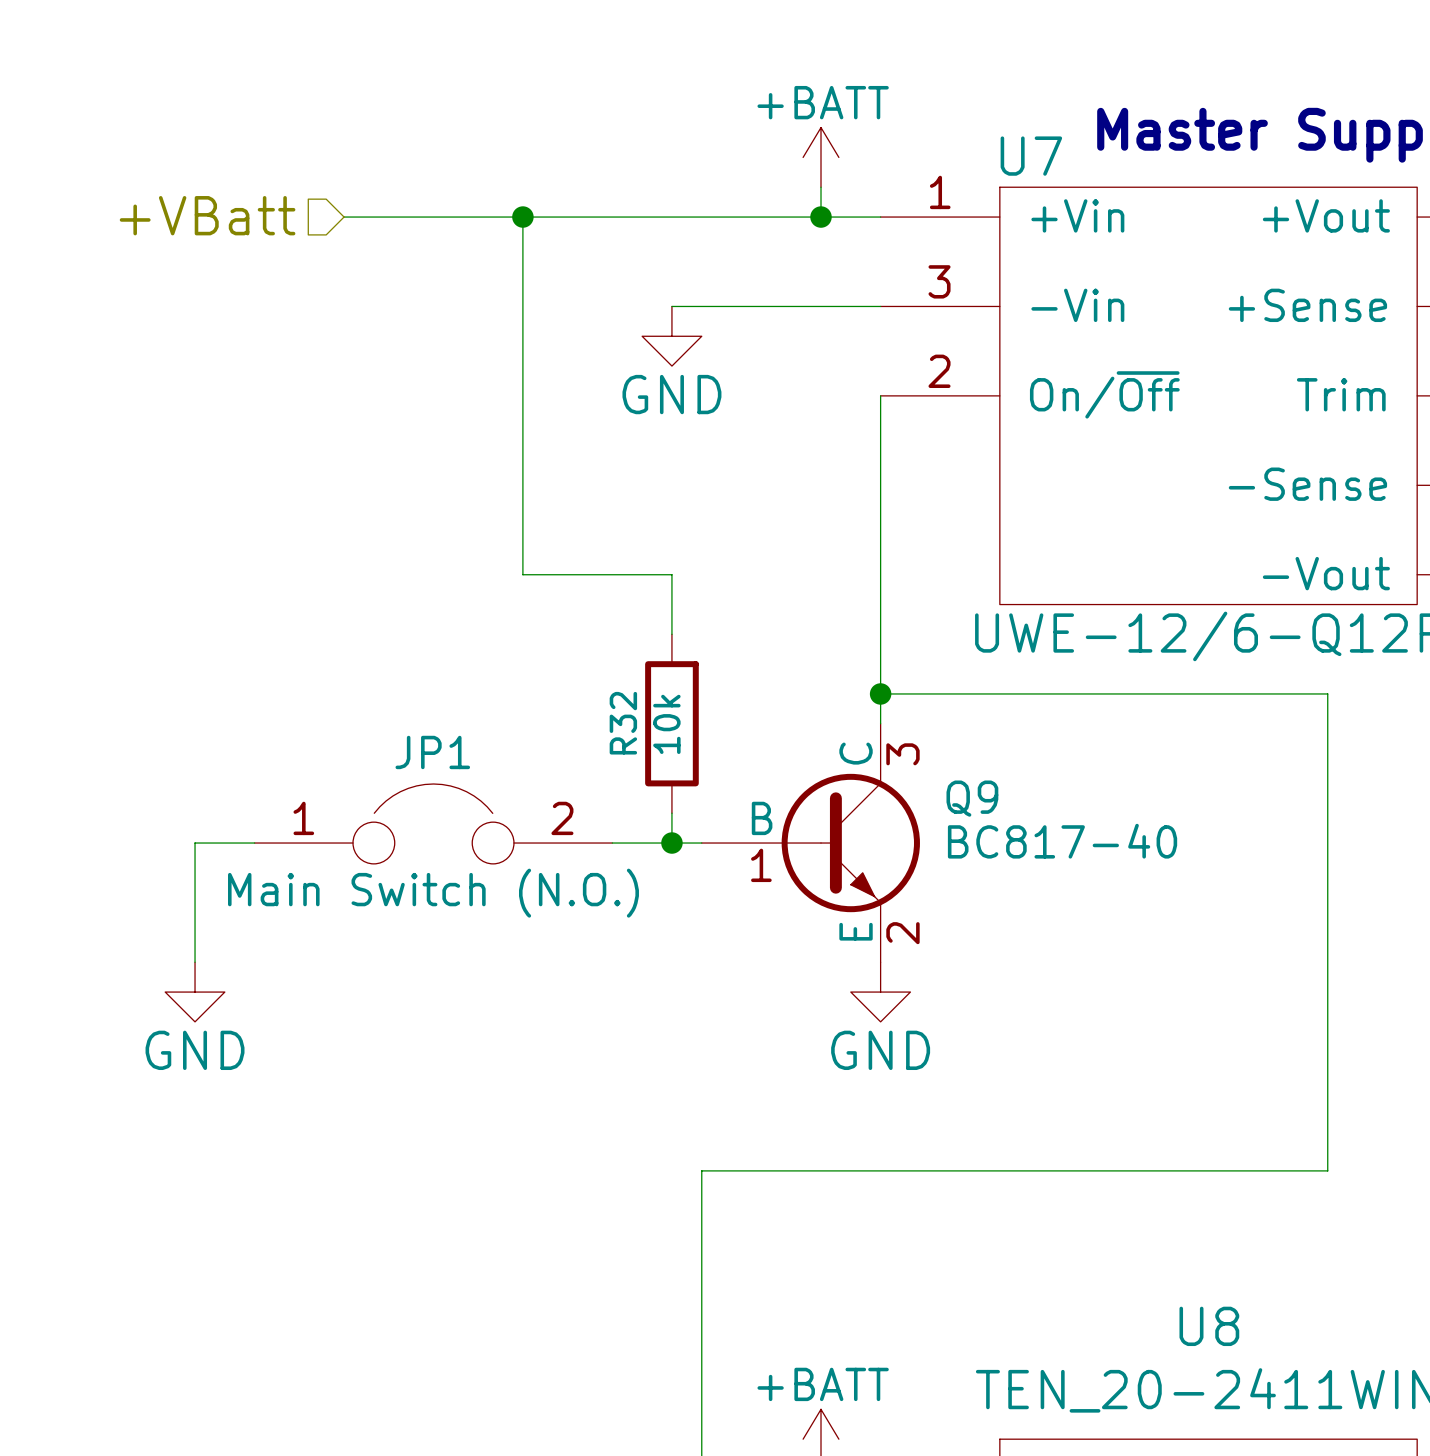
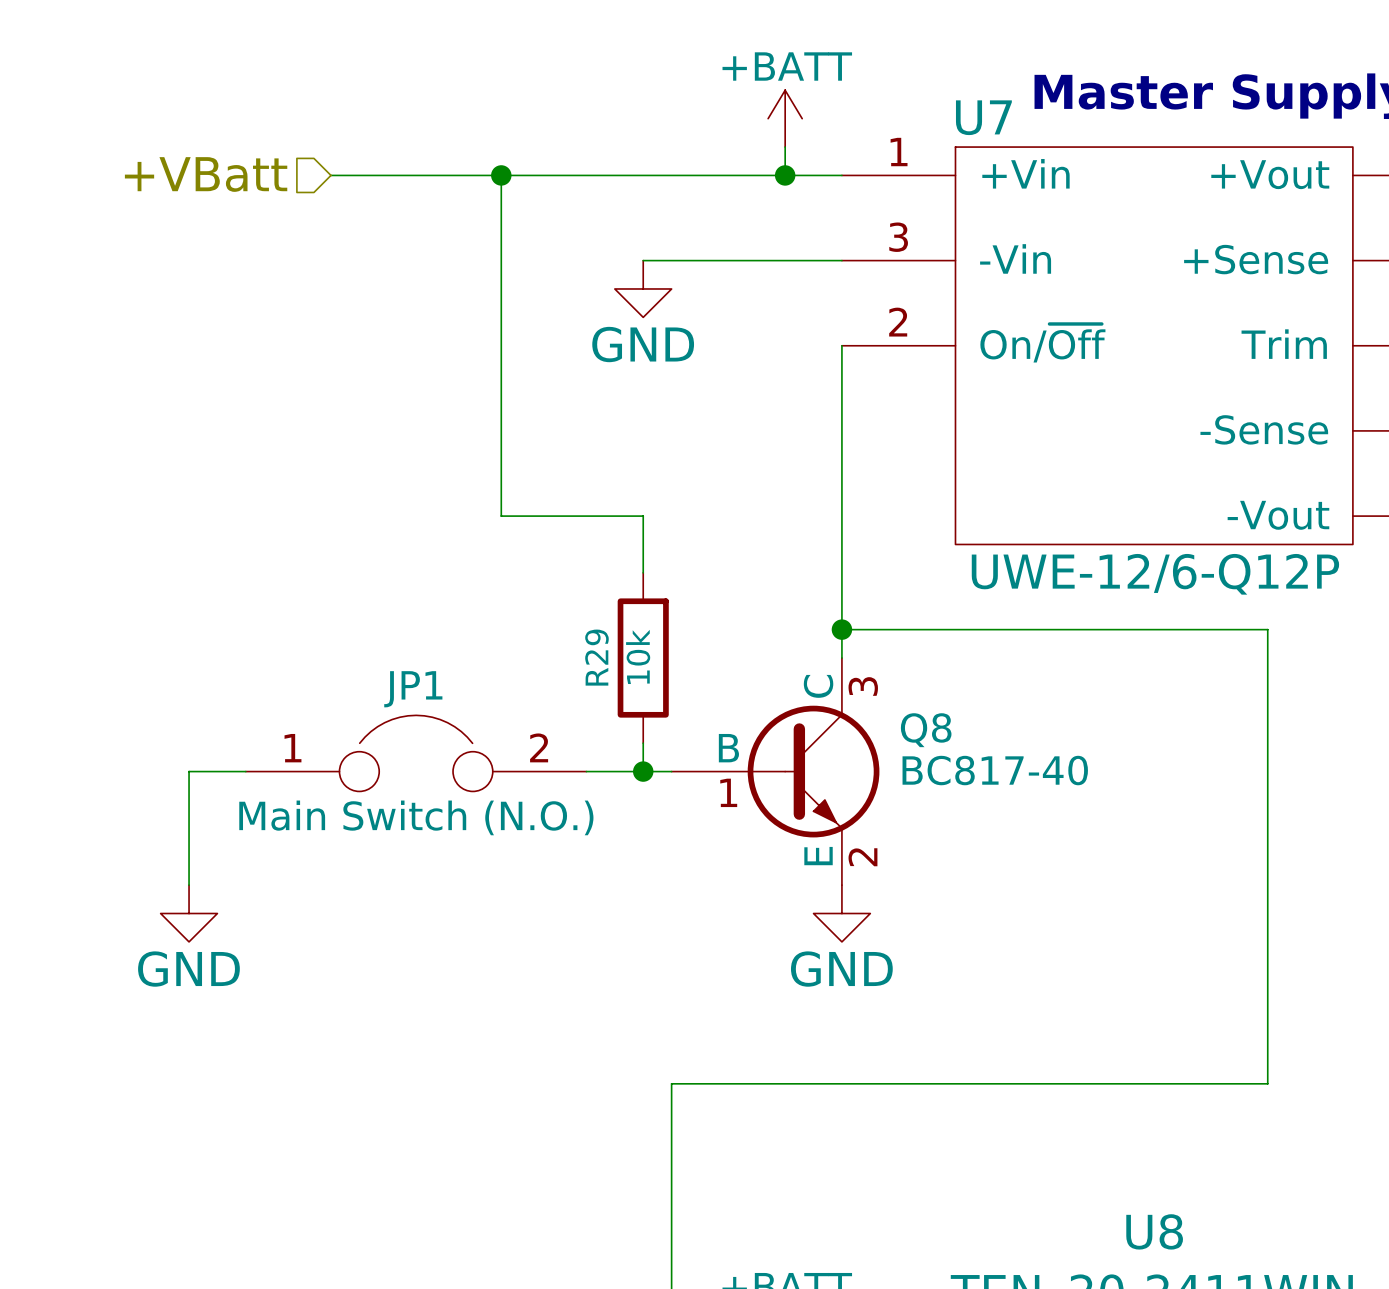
R32 name: R32 (623, 723) -> R29 (596, 657)
Q9 name: Q9 (972, 798) -> Q8 (926, 730)

